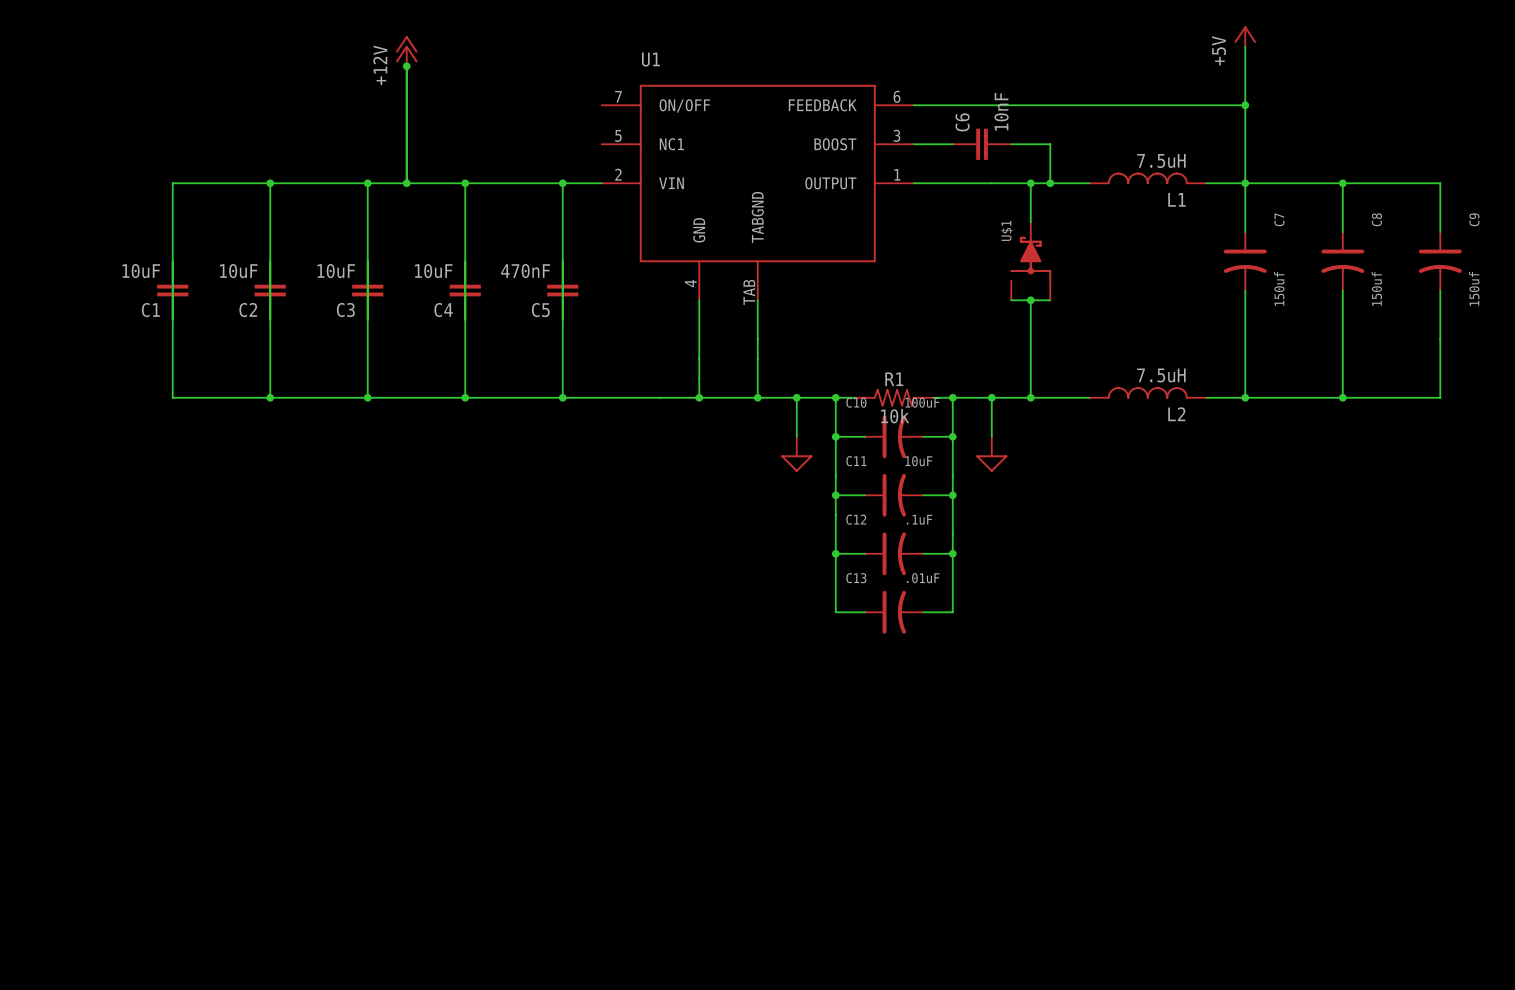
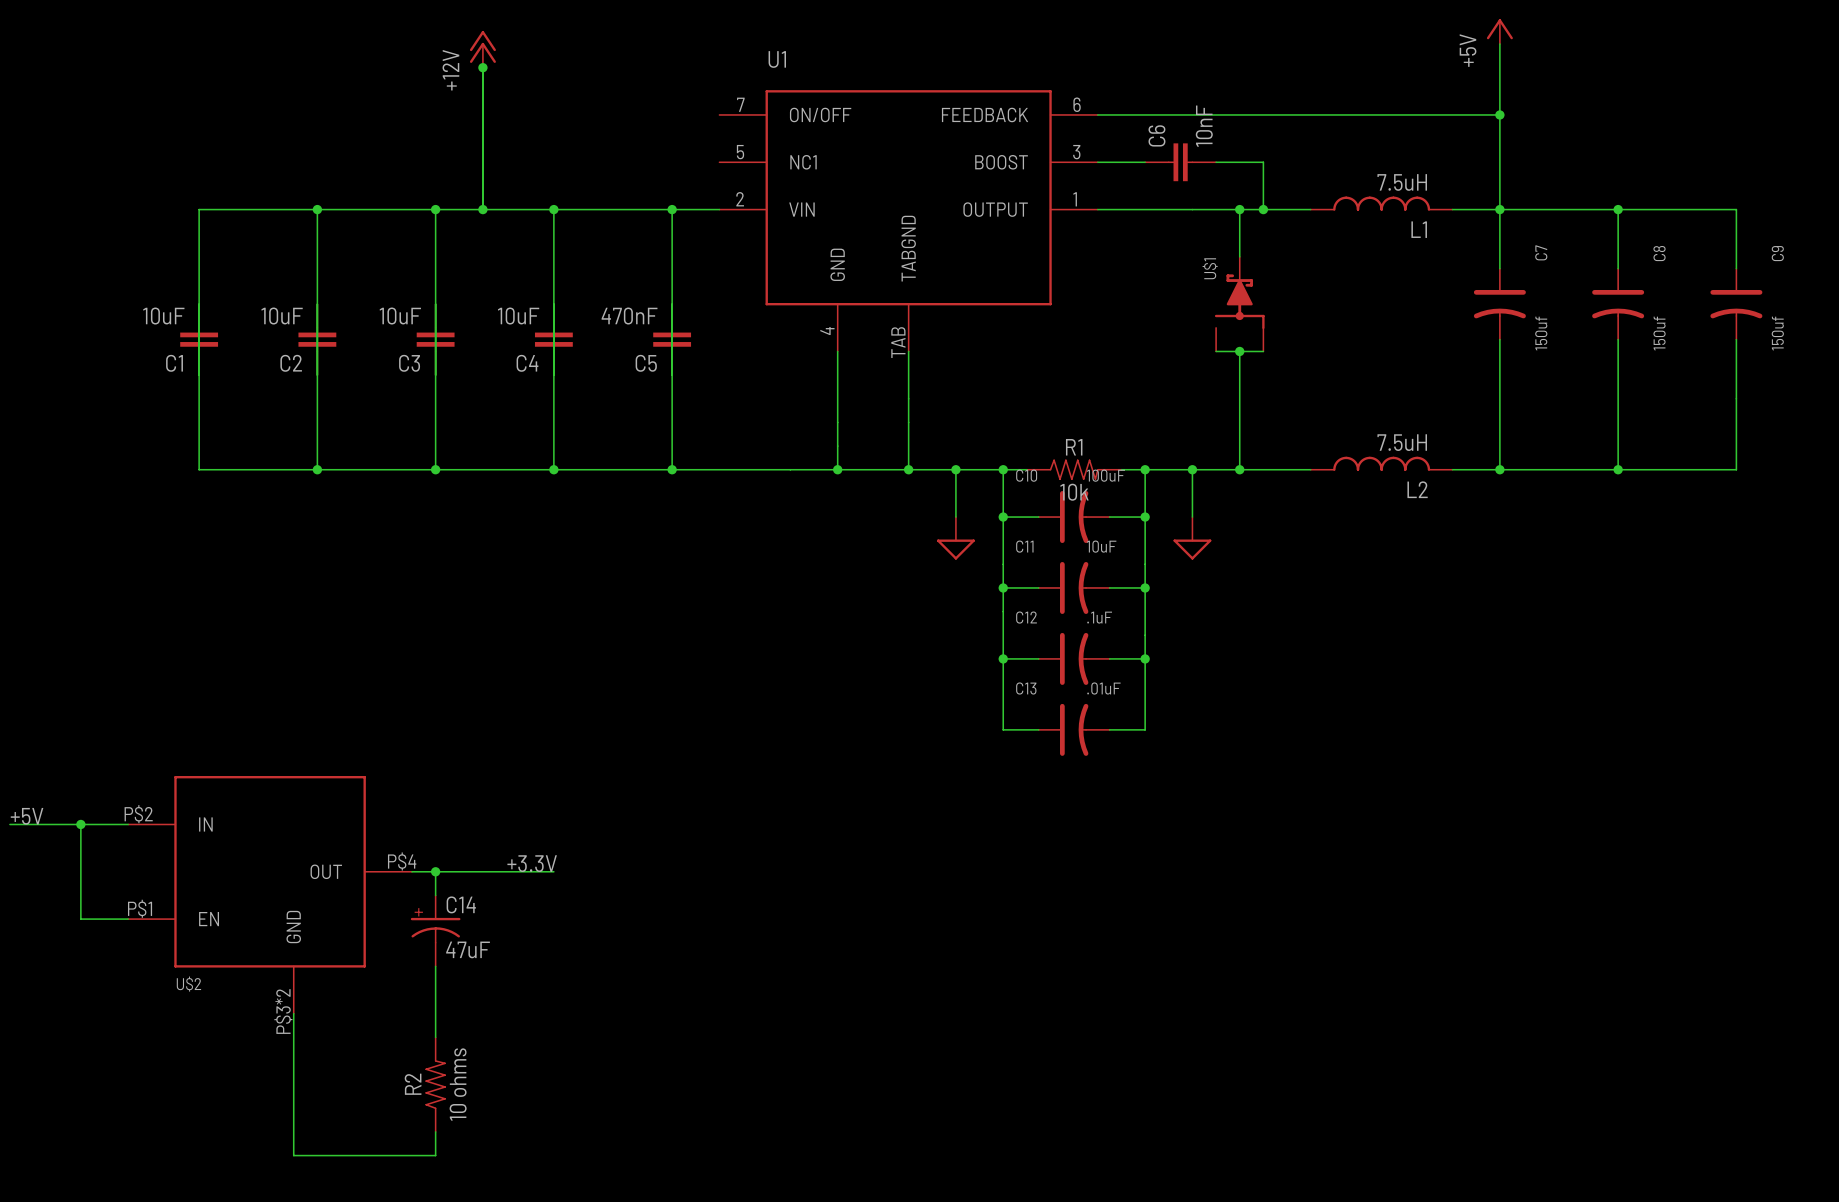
label: none -> +5V (27, 816)
wire: none -> (9, 824) (128, 824)
wire: none -> (80, 824) (80, 919) (128, 919)
junction: none -> (80, 824)
label: none -> +3.3V (532, 863)
wire: none -> (411, 871) (553, 871)
wire: none -> (435, 871) (435, 895)
junction: none -> (435, 871)
U$2: none -> (270, 894)
C14: none -> 47uF (435, 930)
wire: none -> (435, 966) (435, 1037)
wire: none -> (293, 1013) (293, 1155) (435, 1155) (435, 1131)
R2: none -> 10 ohms (435, 1084)

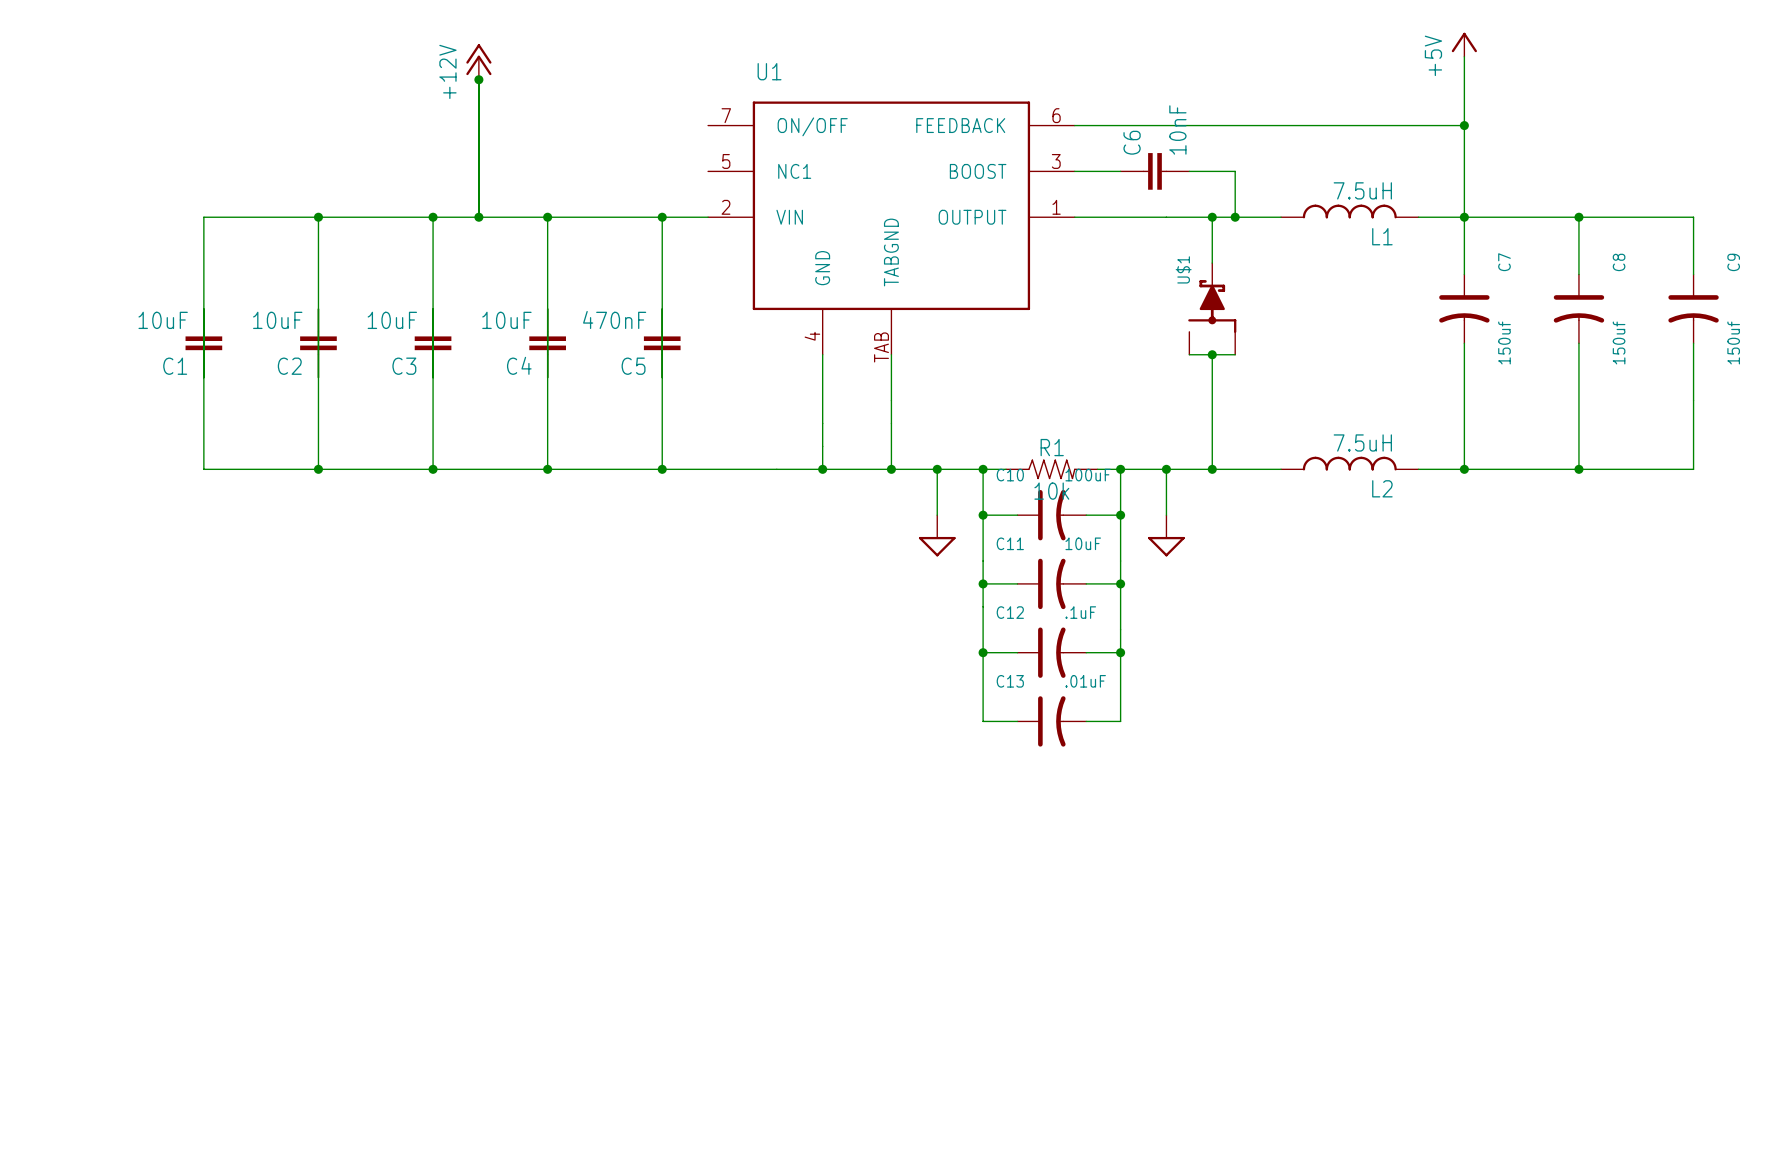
label: +5V (27, 816) -> none
wire: (9, 824) (128, 824) -> none
wire: (80, 824) (80, 919) (128, 919) -> none
junction: (80, 824) -> none
label: +3.3V (532, 863) -> none
wire: (411, 871) (553, 871) -> none
wire: (435, 871) (435, 895) -> none
junction: (435, 871) -> none
U$2: (270, 894) -> none
C14: 47uF (435, 930) -> none
wire: (435, 966) (435, 1037) -> none
wire: (293, 1013) (293, 1155) (435, 1155) (435, 1131) -> none
R2: 10 ohms (435, 1084) -> none

